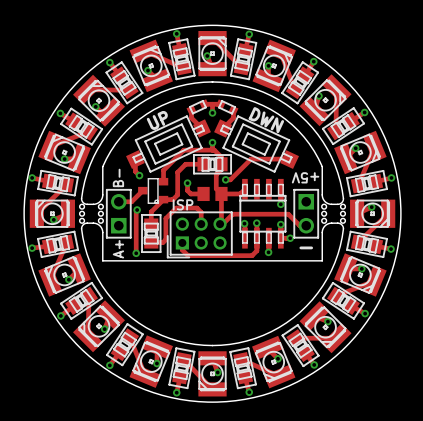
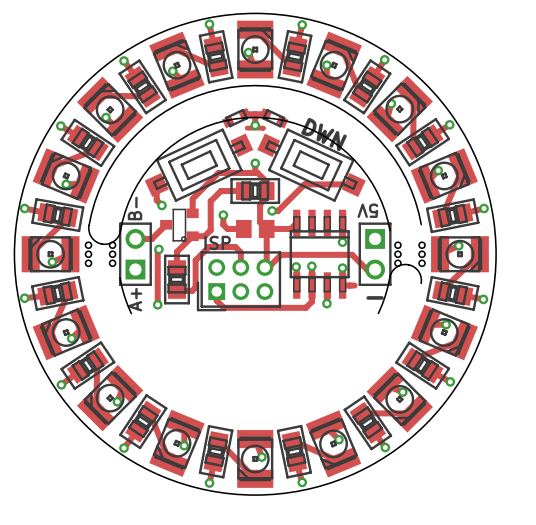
board edge: (212, 81) (238, 84) (263, 92) (286, 104) (306, 121) (322, 141) (334, 164) (343, 198) (339, 203) (329, 204) (322, 198) (322, 166) -> none
board edge: (212, 81) (186, 84) (161, 92) (146, 99) (124, 115) (107, 134) (93, 156) (84, 181) (81, 198) (83, 202) (94, 204) (101, 199) (102, 166) (115, 143) (133, 124) (161, 105) (195, 95) (212, 94) (238, 97) (270, 109) (298, 130) (314, 151) (322, 166) -> none
track: (191, 110) (191, 118) (202, 128) (198, 128) -> none
track: (233, 110) (233, 118) (223, 128) (226, 128) -> none
track: none -> (247, 128) (263, 128)
text: UP (157, 120) -> none
text: +5V (305, 177) -> 5V (367, 210)
board edge: none -> (421, 224) (411, 190) (401, 169) (387, 150) (363, 124) (334, 105) (312, 95) (289, 89) (254, 85) (219, 89) (197, 95) (165, 111) (146, 125) (122, 150) (109, 170) (94, 202) (88, 227) (90, 235) (97, 242) (105, 244) (113, 241) (119, 235) (125, 211) (137, 184) (163, 153) (187, 135) (205, 126) (224, 120) (254, 117) (294, 123) (313, 130) (339, 146) (354, 159) (372, 183) (381, 201) (390, 230)
board edge: none -> (119, 277) (131, 313)
board edge: none -> (421, 283) (419, 273) (414, 267) (404, 264) (396, 267) (390, 275) (378, 313)
via: (290, 238) -> none
board edge: (212, 345) (221, 345) (238, 342) (255, 338) (279, 327) (300, 312) (317, 292) (331, 270) (340, 245) (343, 228) (341, 224) (330, 223) (323, 227) (322, 260) (102, 260) (101, 227) (94, 223) (83, 224) (81, 228) (84, 245) (93, 270) (107, 292) (124, 312) (138, 322) (161, 335) (186, 342) (203, 345) (212, 345) -> none

